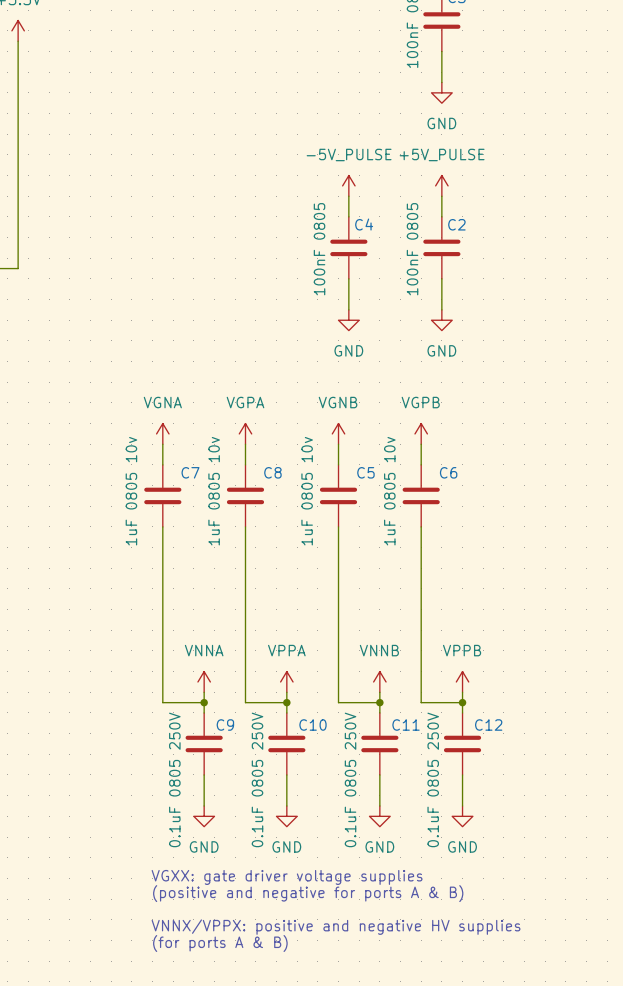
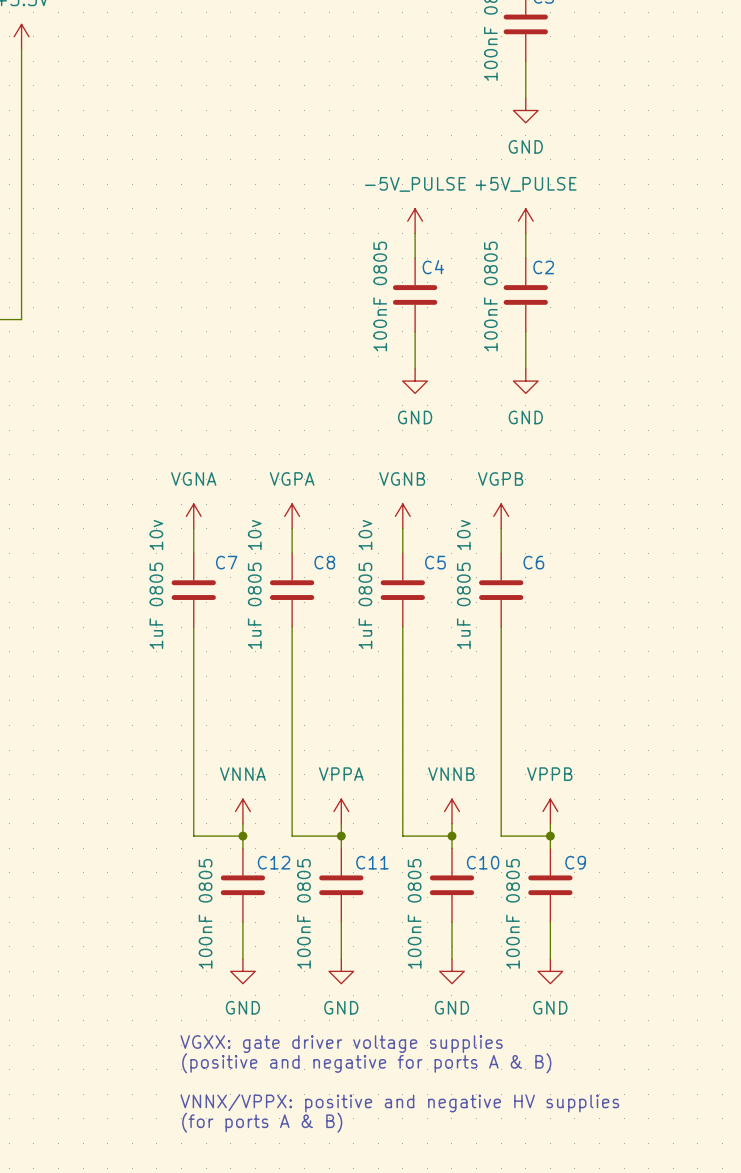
C9 name: C9 (225, 725) -> C12 (274, 862)
C10 name: C10 (313, 725) -> C11 (372, 862)
C11 name: C11 (406, 725) -> C10 (483, 862)
C12 name: C12 (488, 725) -> C9 (575, 862)
C9 value: 0.1uF 0805 250V (174, 779) -> 100nF 0805 (205, 913)
C10 value: 0.1uF 0805 250V (257, 779) -> 100nF 0805 (303, 913)
C11 value: 0.1uF 0805 250V (350, 779) -> 100nF 0805 (414, 913)
C12 value: 0.1uF 0805 250V (433, 779) -> 100nF 0805 (513, 913)

